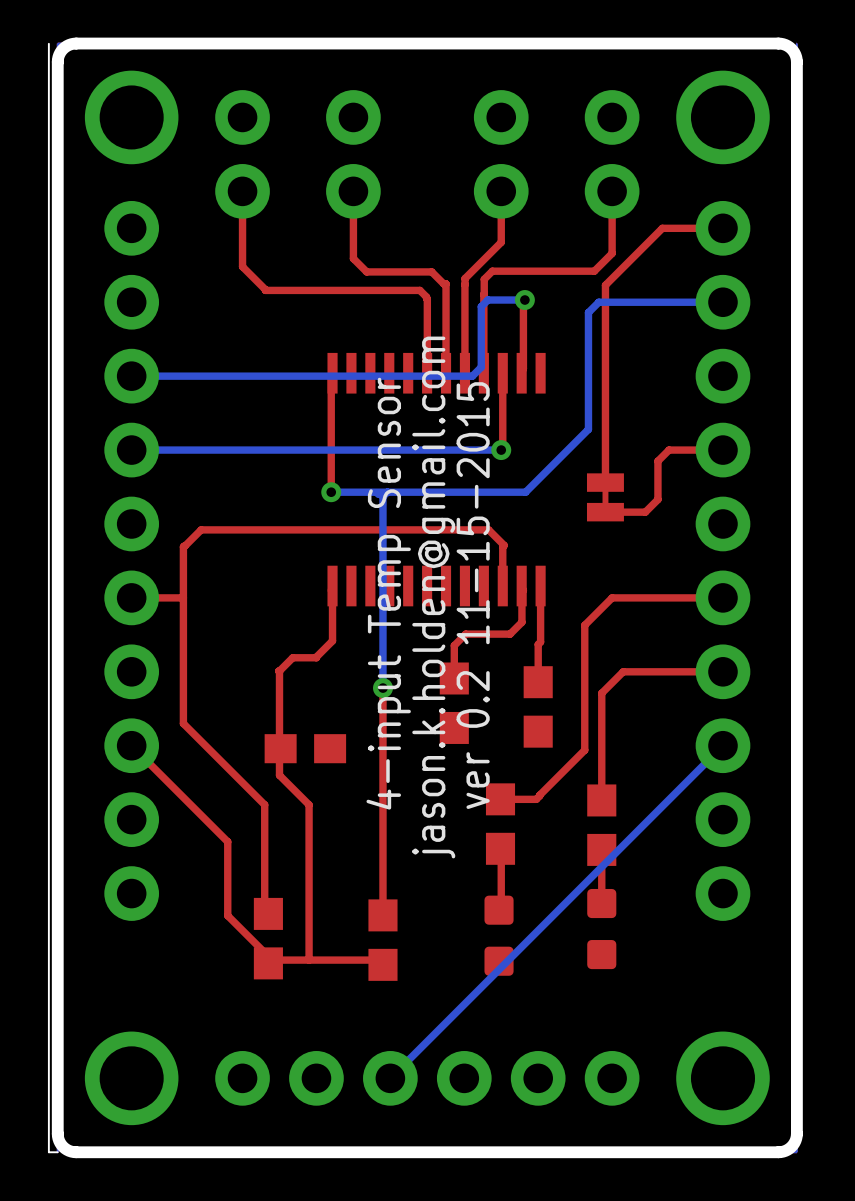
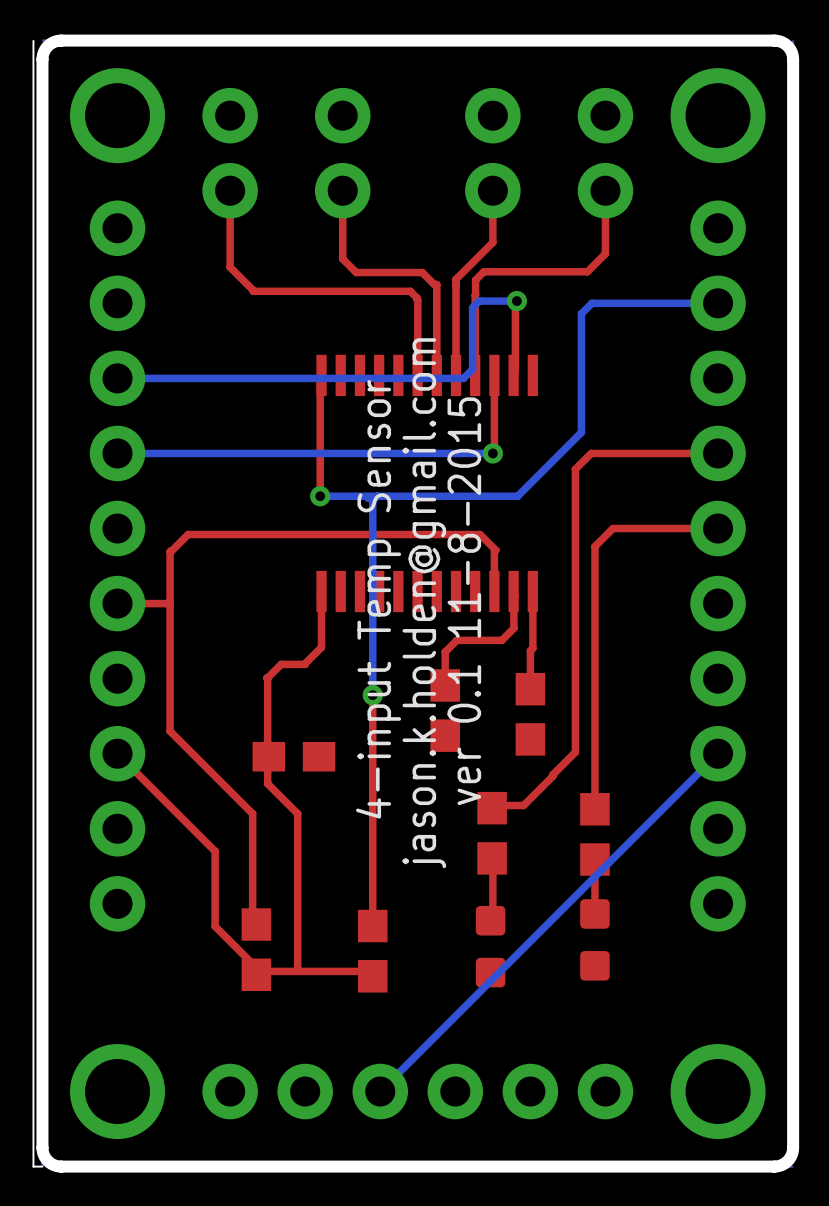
top track: (722, 228) (662, 228) (605, 285) (605, 482) -> none
top track: (669, 450) (657, 461) (657, 499) (645, 512) (605, 512) -> none
part: (605, 497) -> none
text: ver 0.2 11-15-2015 (473, 595) -> ver 0.1 11-8-2015 (464, 601)
top track: (722, 597) (612, 597) (584, 625) (584, 750) (536, 799) (500, 799) -> (663, 453) (591, 453) (575, 469) (575, 752) (523, 805) (491, 805) (492, 808)
top track: (722, 671) (623, 671) (601, 693) -> (718, 528) (612, 528) (594, 546) (594, 700)

